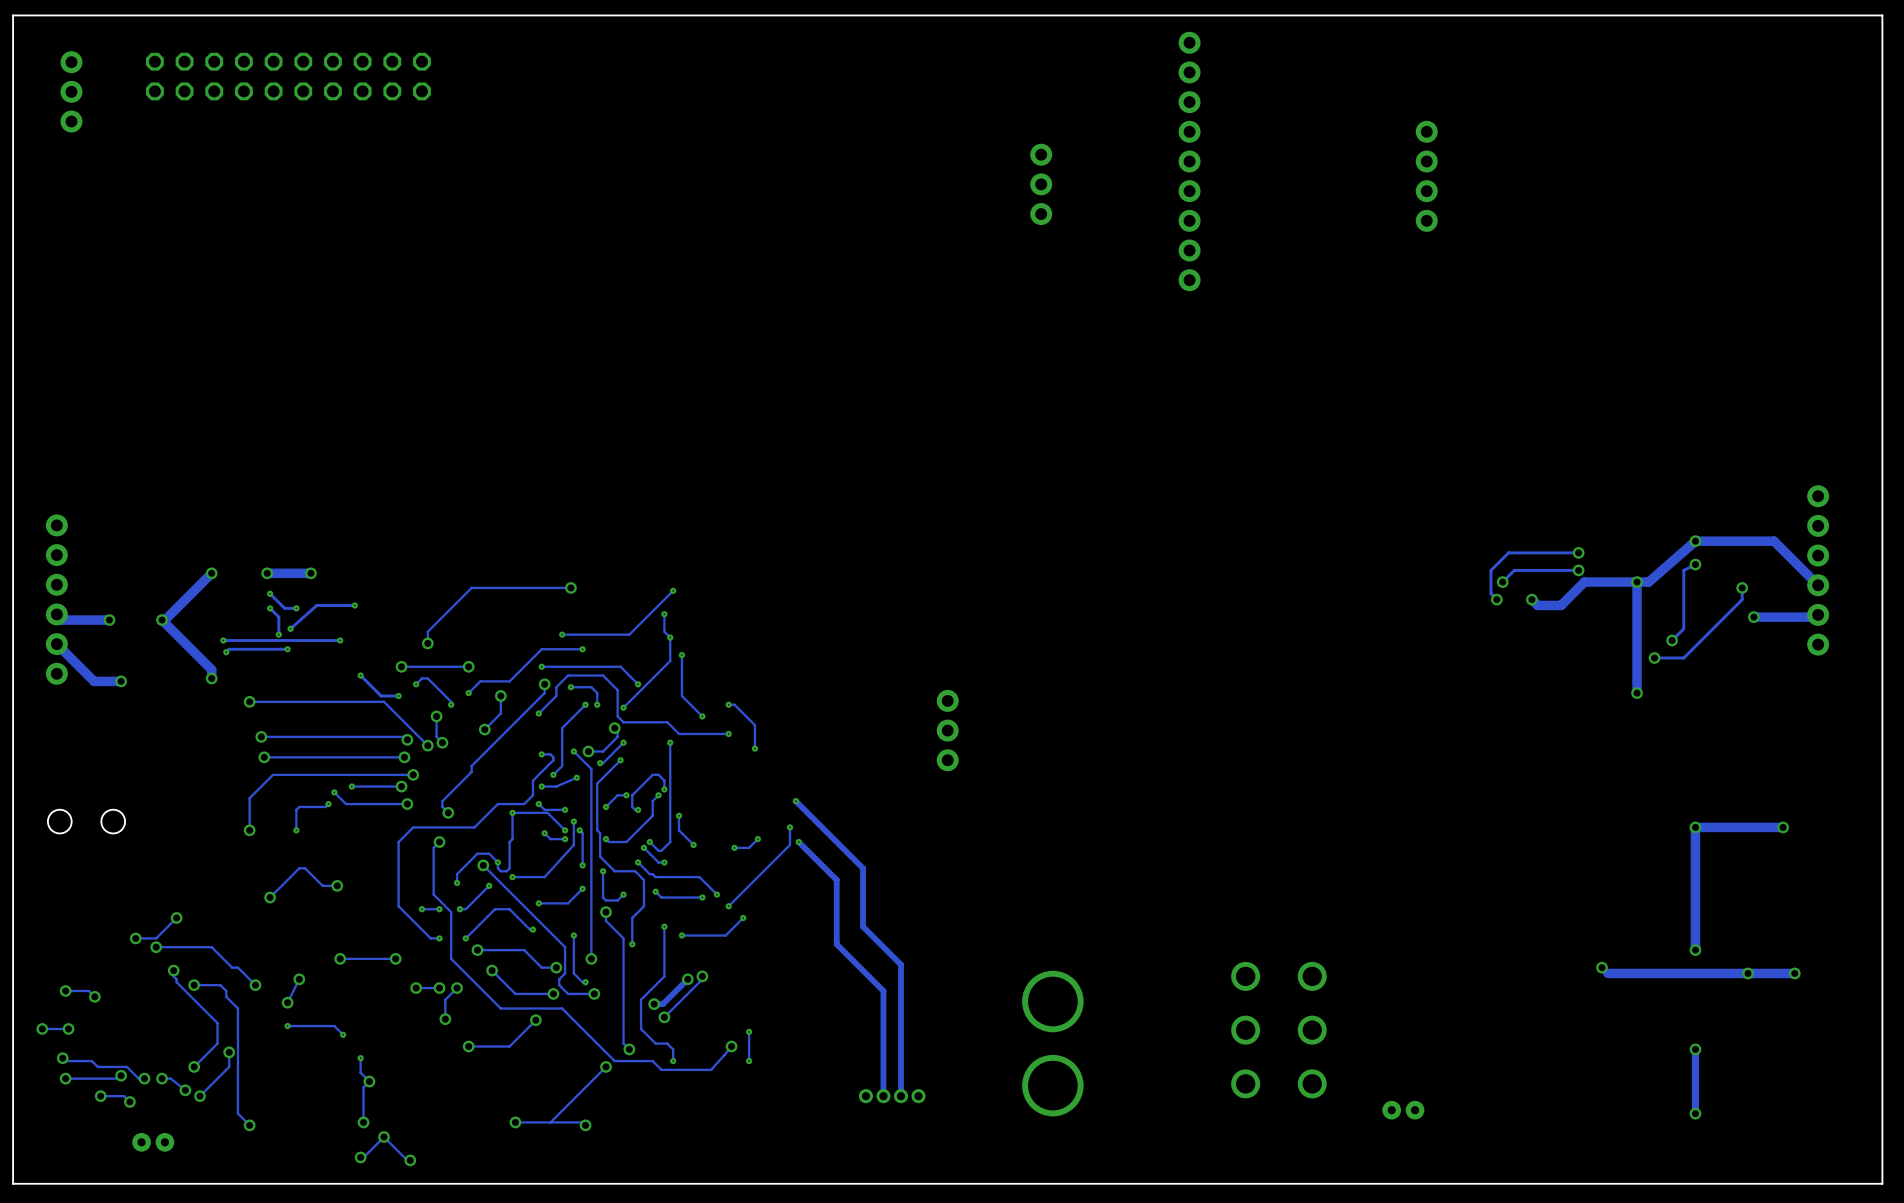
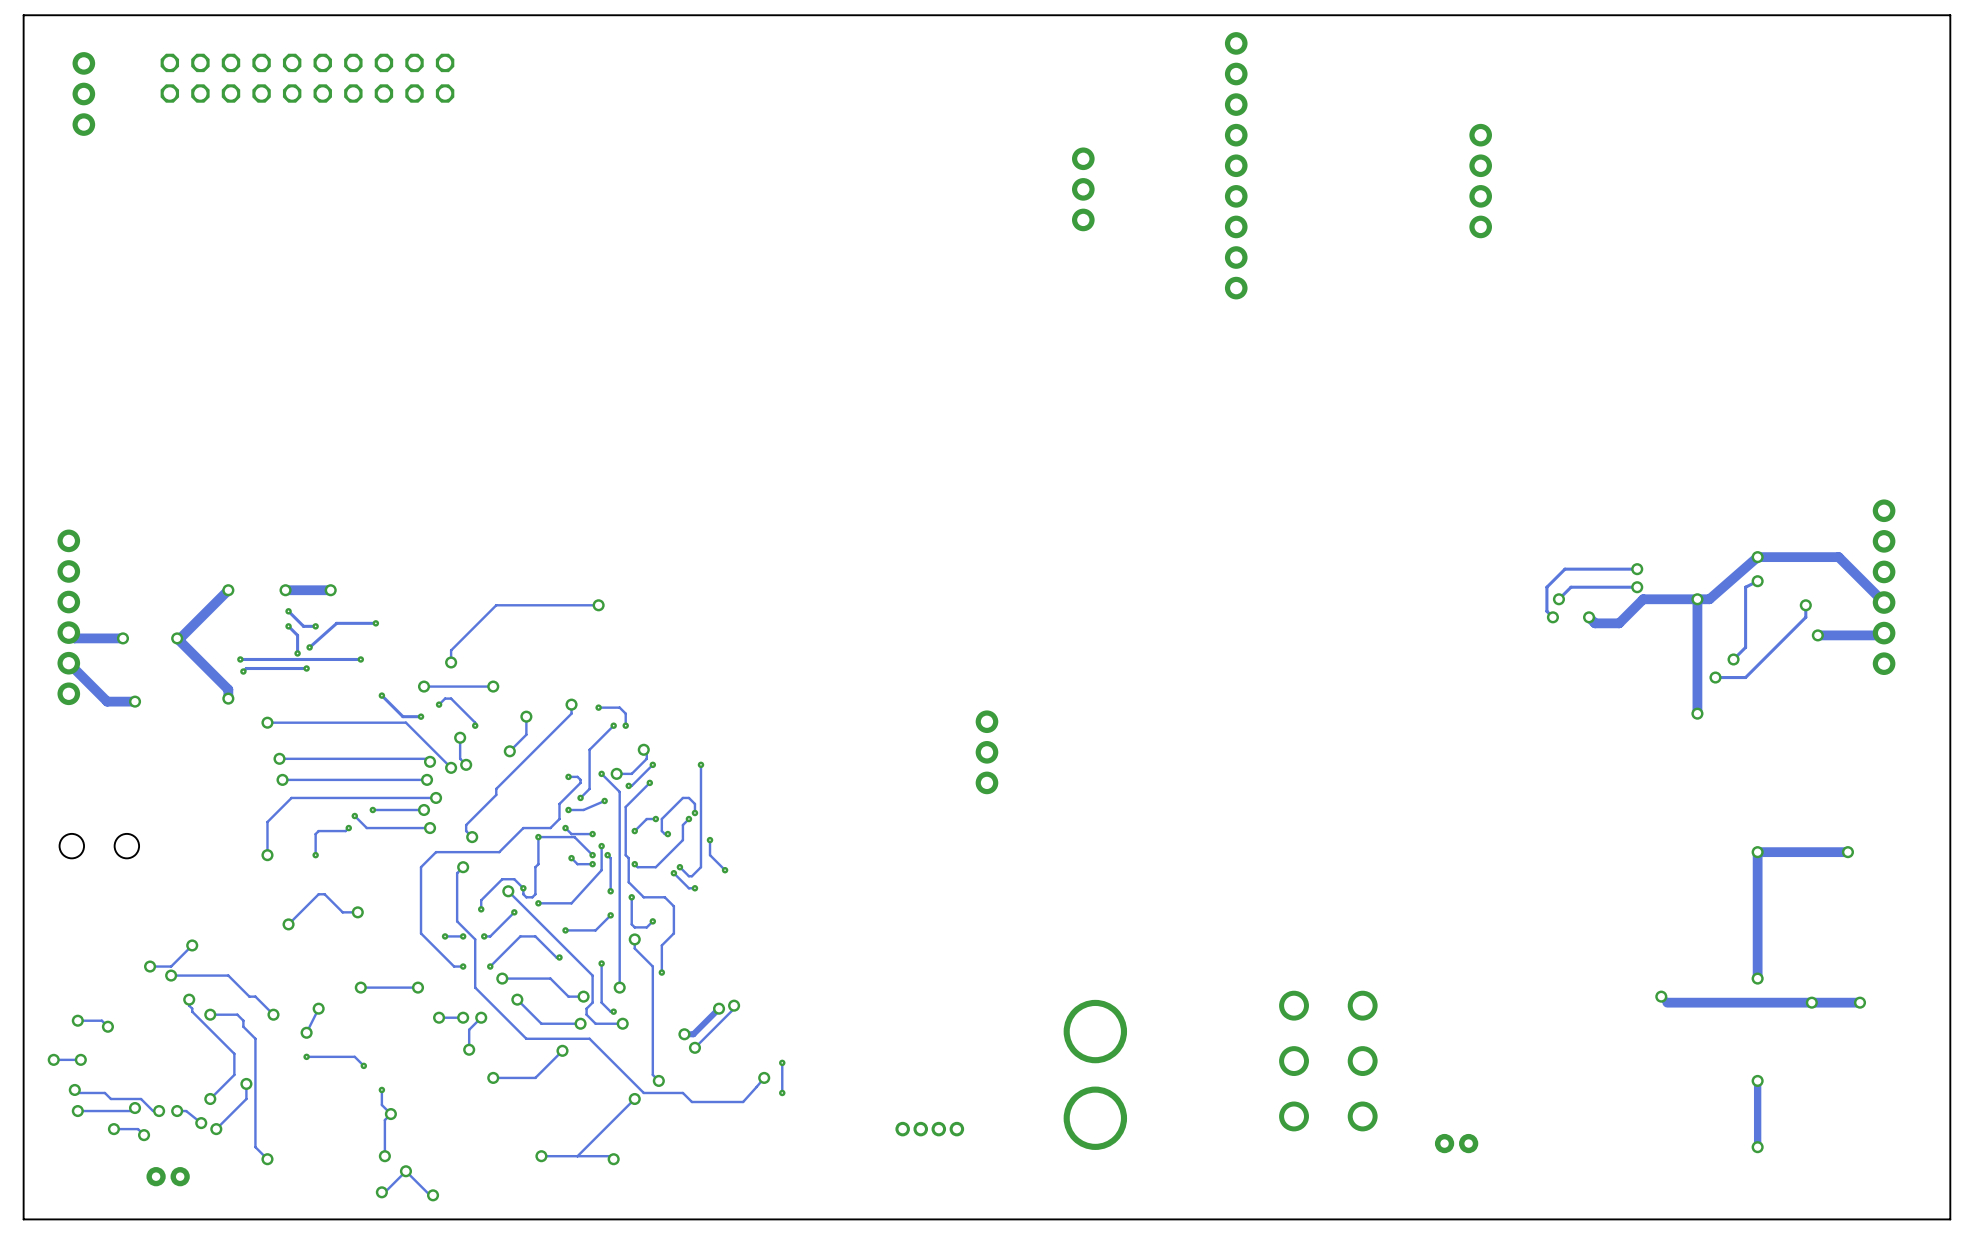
track: (673, 590) (629, 634) (562, 634) -> none
via: (673, 590) -> none
track: (664, 614) (664, 631) (670, 637) (670, 660) (623, 707) -> none
via: (664, 614) -> none
via: (562, 634) -> none
via: (670, 637) -> none
track: (582, 649) (541, 649) (509, 681) (480, 681) (468, 693) -> none
via: (582, 649) -> none
track: (681, 655) (681, 695) (702, 716) -> none
via: (681, 655) -> none
track: (541, 666) (620, 666) (638, 684) -> none
via: (541, 666) -> none
via: (638, 684) -> none
via: (468, 693) -> none
track: (728, 704) (734, 704) (754, 725) (754, 748) -> none
via: (728, 704) -> none
via: (623, 707) -> none
track: (538, 713) (556, 695) (556, 687) (568, 675) (603, 675) (617, 690) (617, 716) (623, 722) (667, 722) (679, 733) (728, 733) -> none
via: (538, 713) -> none
via: (702, 716) -> none
via: (728, 733) -> none
via: (754, 748) -> none
track: (795, 801) (863, 868) (863, 926) (900, 964) (900, 1096) -> none
via: (795, 801) -> none
track: (790, 827) (790, 844) (728, 906) -> none
via: (790, 827) -> none
track: (757, 839) (749, 847) (734, 847) -> none
via: (757, 839) -> none
track: (798, 842) (836, 880) (836, 944) (883, 991) (883, 1096) -> none
via: (798, 842) -> none
via: (734, 847) -> none
track: (638, 862) (655, 877) (699, 877) (716, 894) -> none
via: (638, 862) -> none
track: (655, 891) (661, 897) (702, 897) -> none
via: (655, 891) -> none
via: (716, 894) -> none
via: (702, 897) -> none
via: (728, 906) -> none
track: (743, 917) (725, 935) (681, 935) -> none
via: (743, 917) -> none
track: (664, 926) (664, 976) (641, 999) (641, 1028) (655, 1043) (667, 1043) (673, 1049) (673, 1061) -> none
via: (664, 926) -> none
via: (681, 935) -> none
via: (673, 1061) -> none

